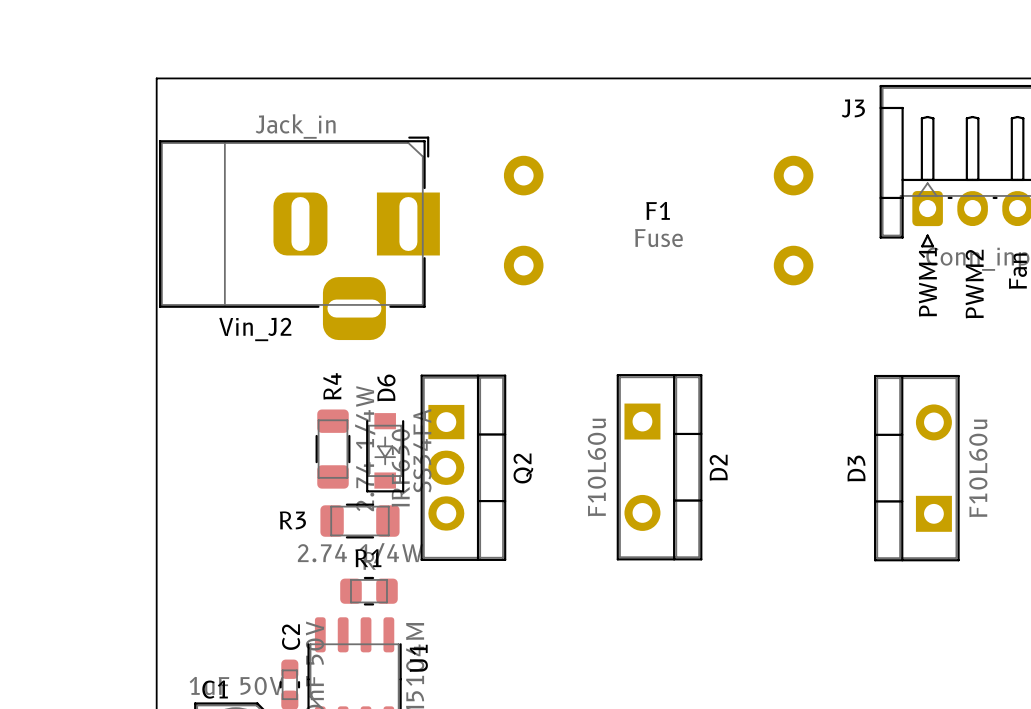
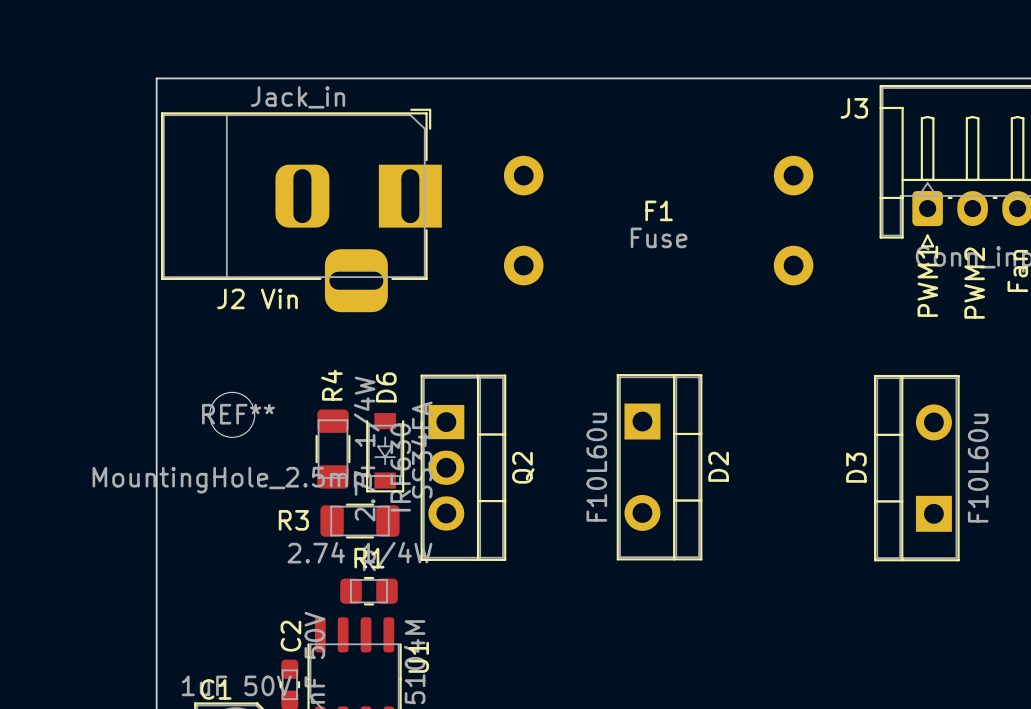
J2 Vin: none -> Jack_in (301, 210)
Vin_J2: Jack_in (299, 238) -> none
REF**: none -> MountingHole_2.5mm (232, 414)

